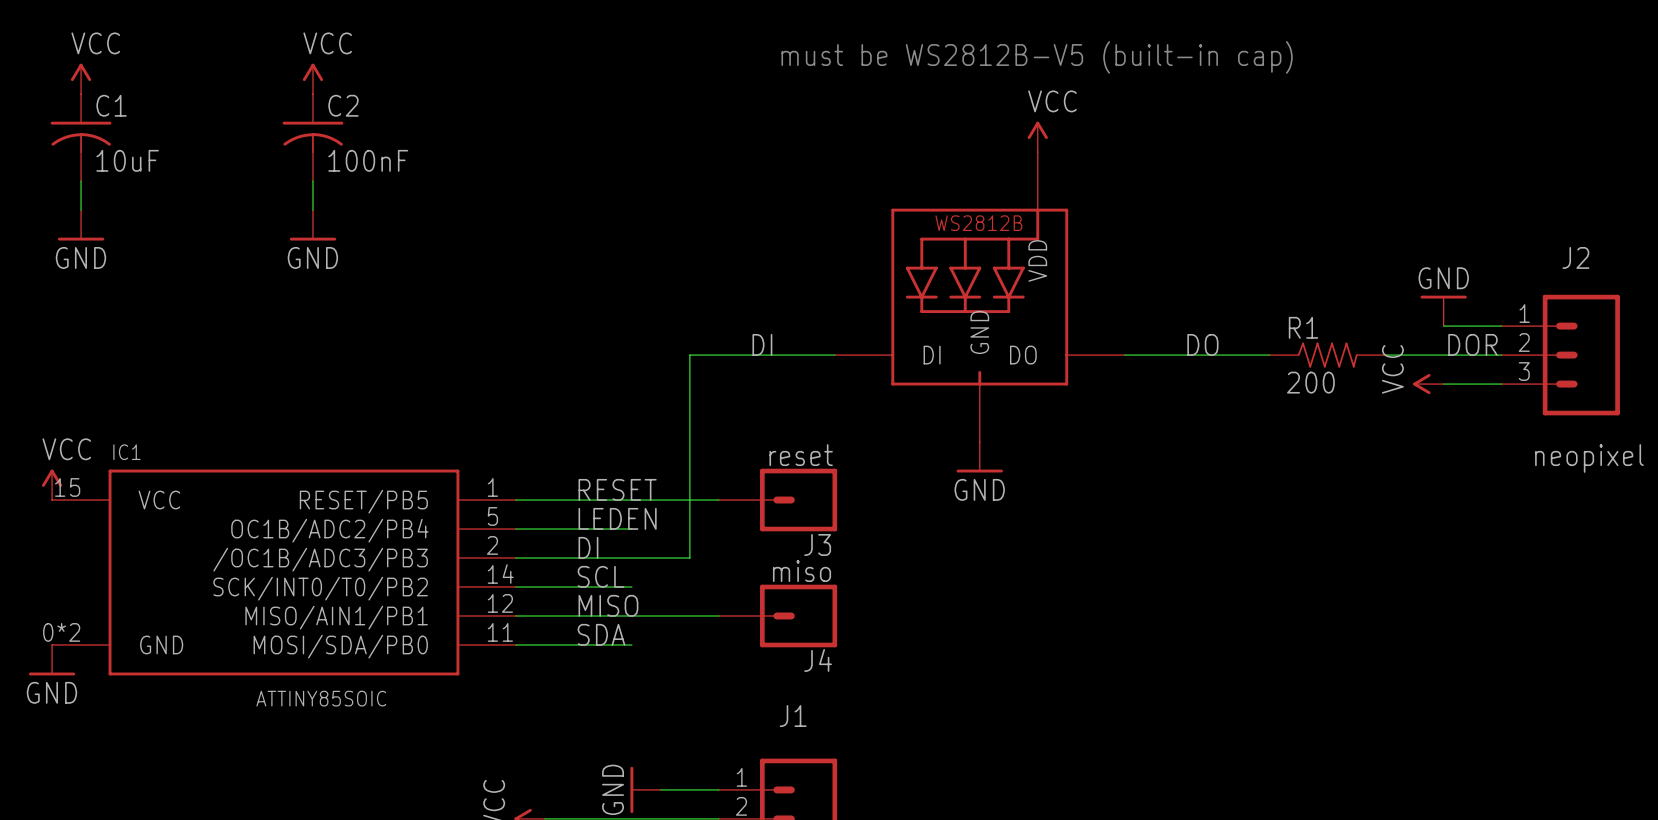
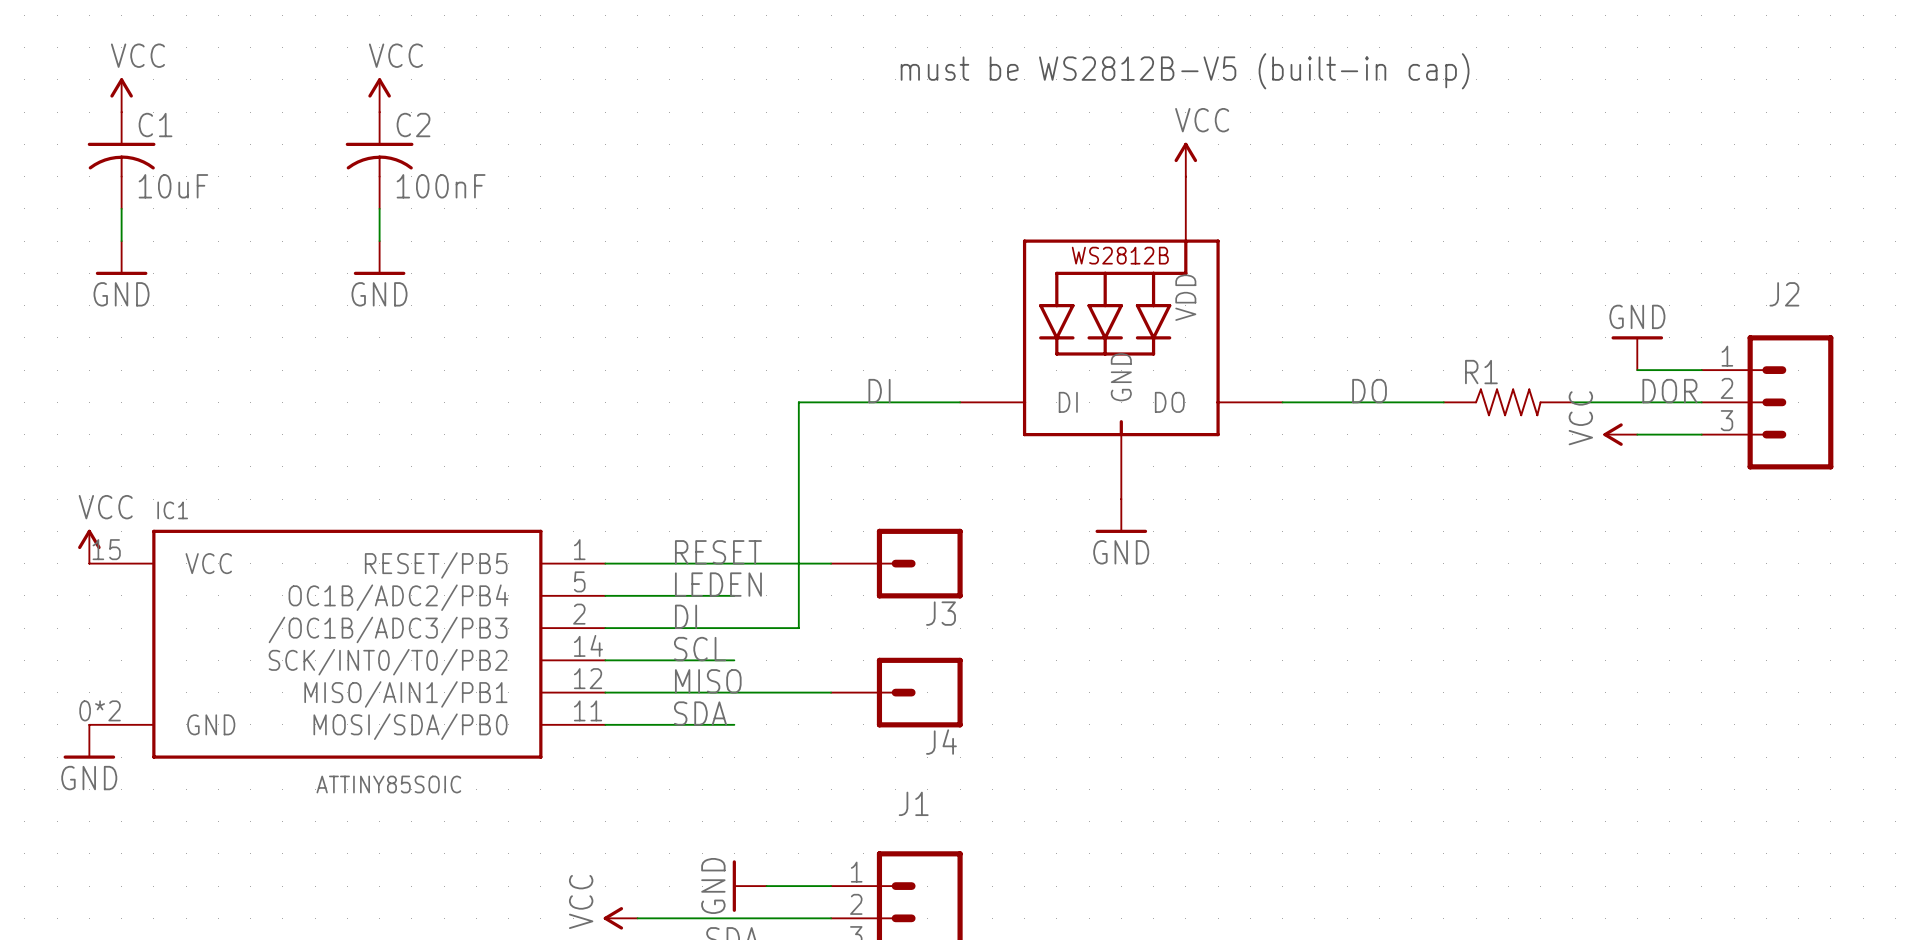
R1 value: 200 (1310, 382) -> none
J3 value: reset (801, 455) -> none
J2 value: neopixel (1589, 458) -> none
J4 value: miso (802, 571) -> none

